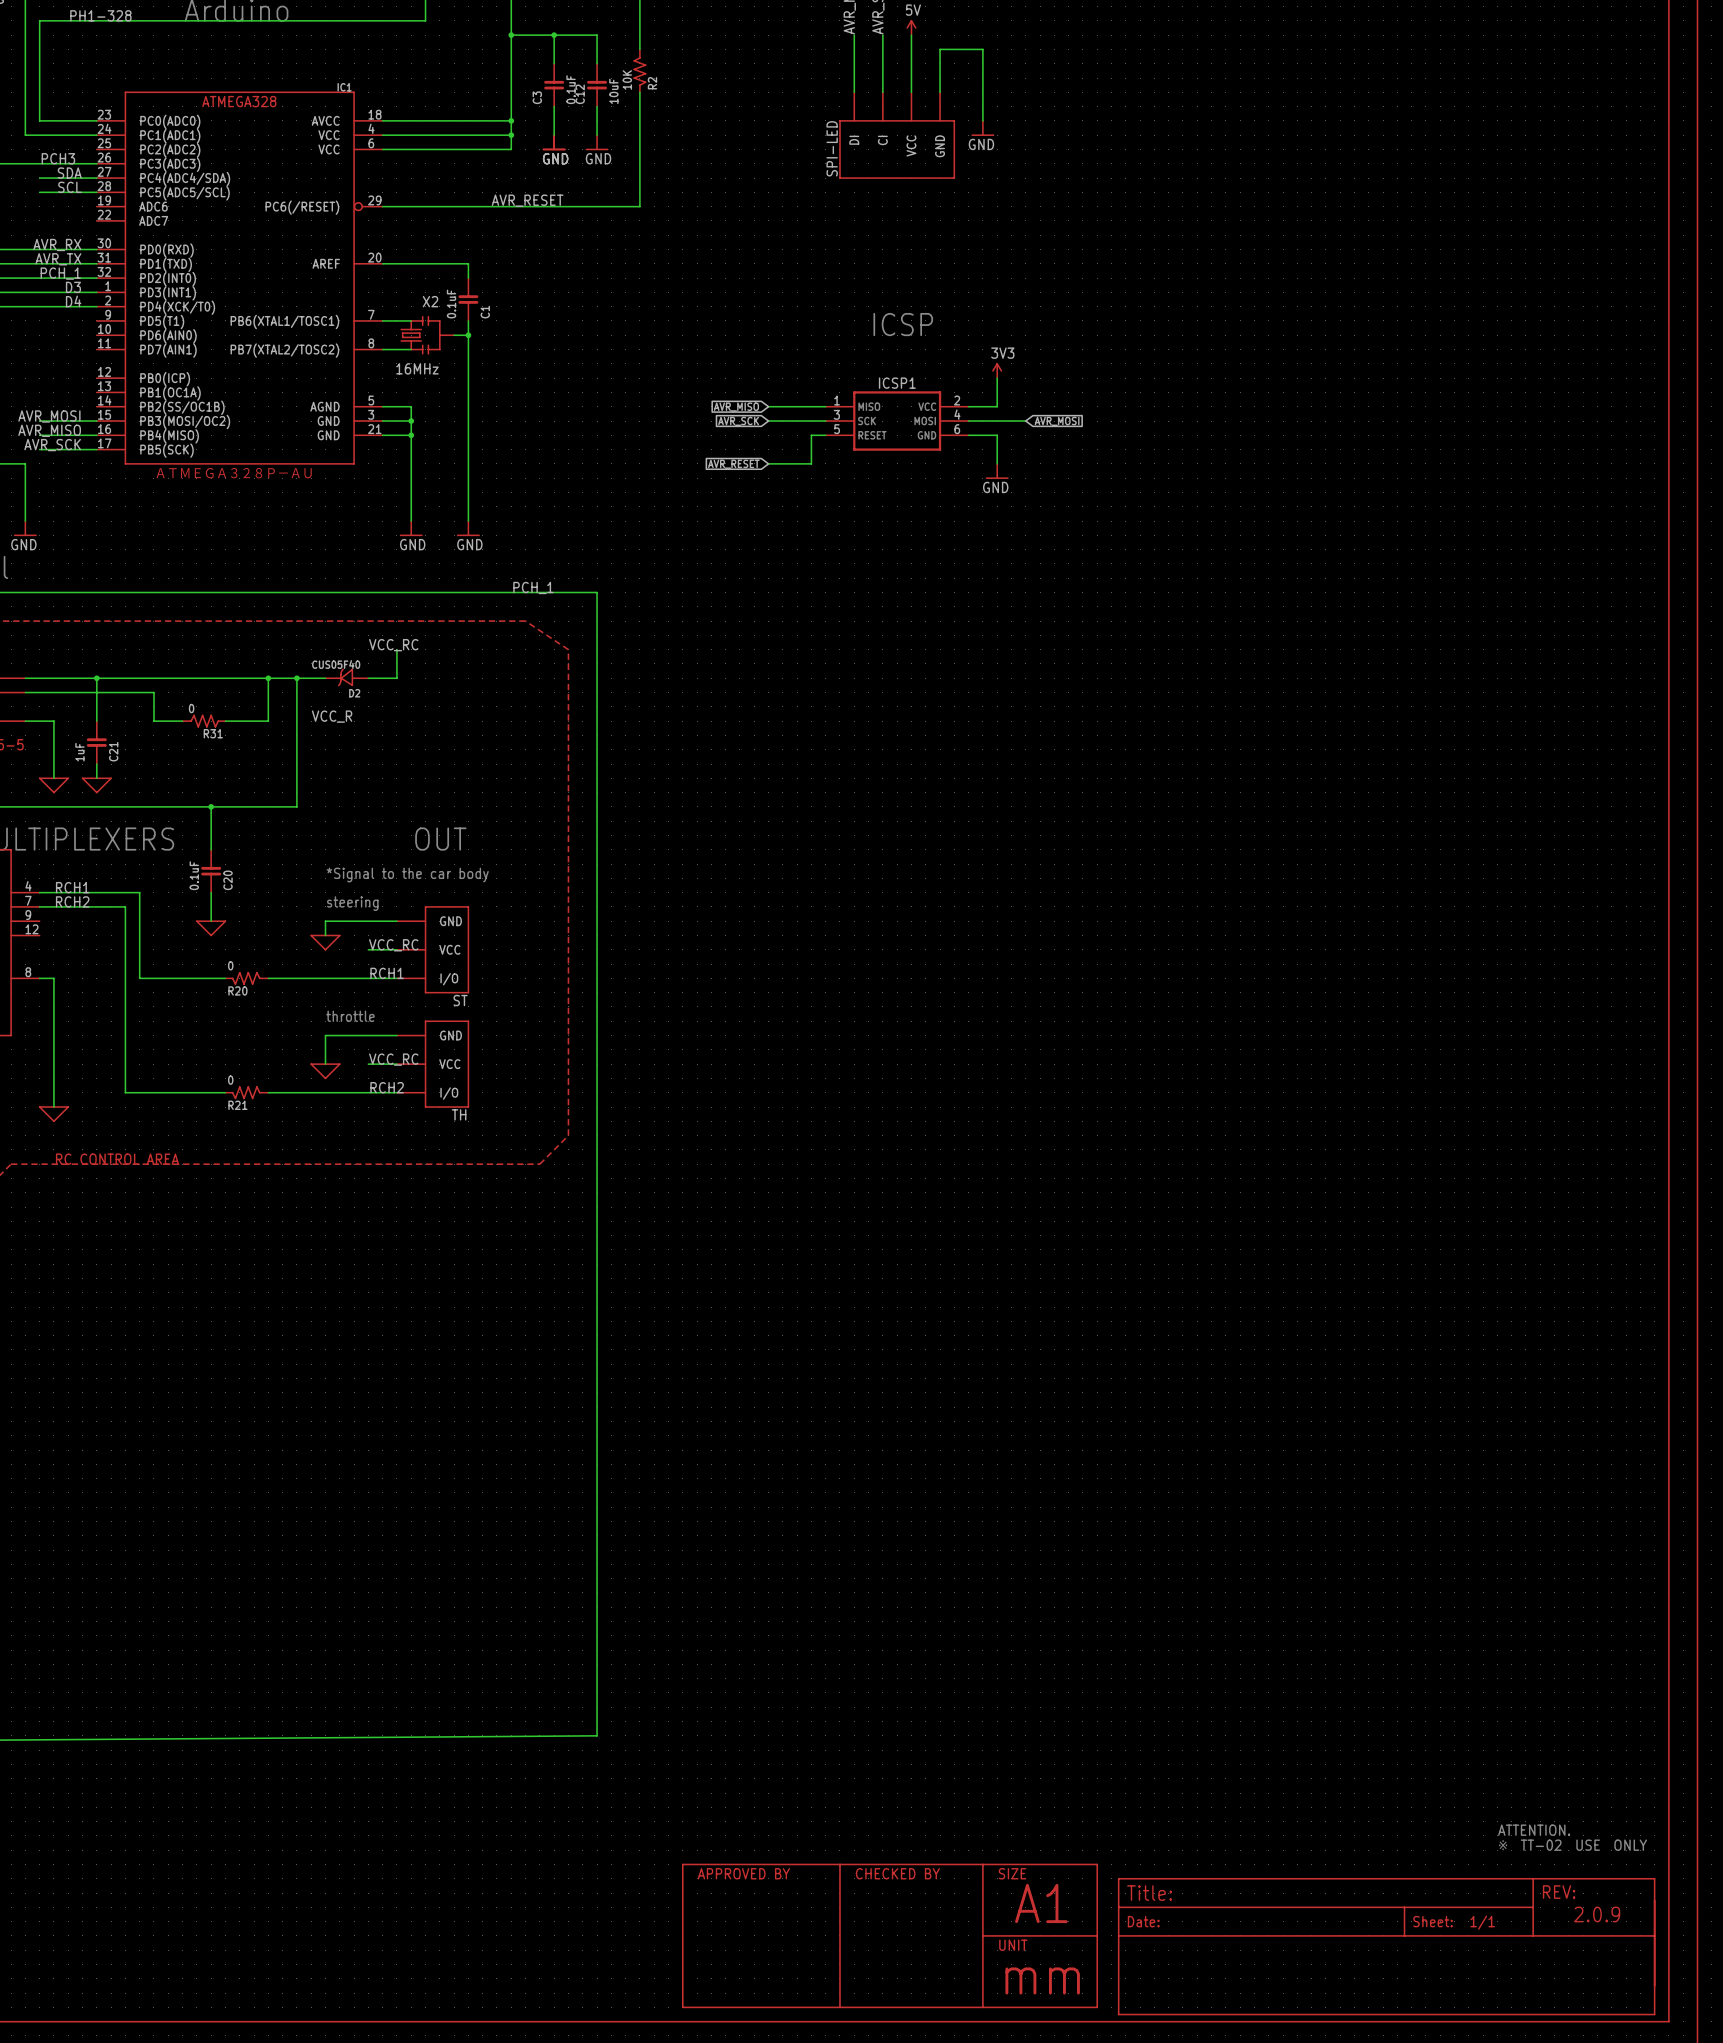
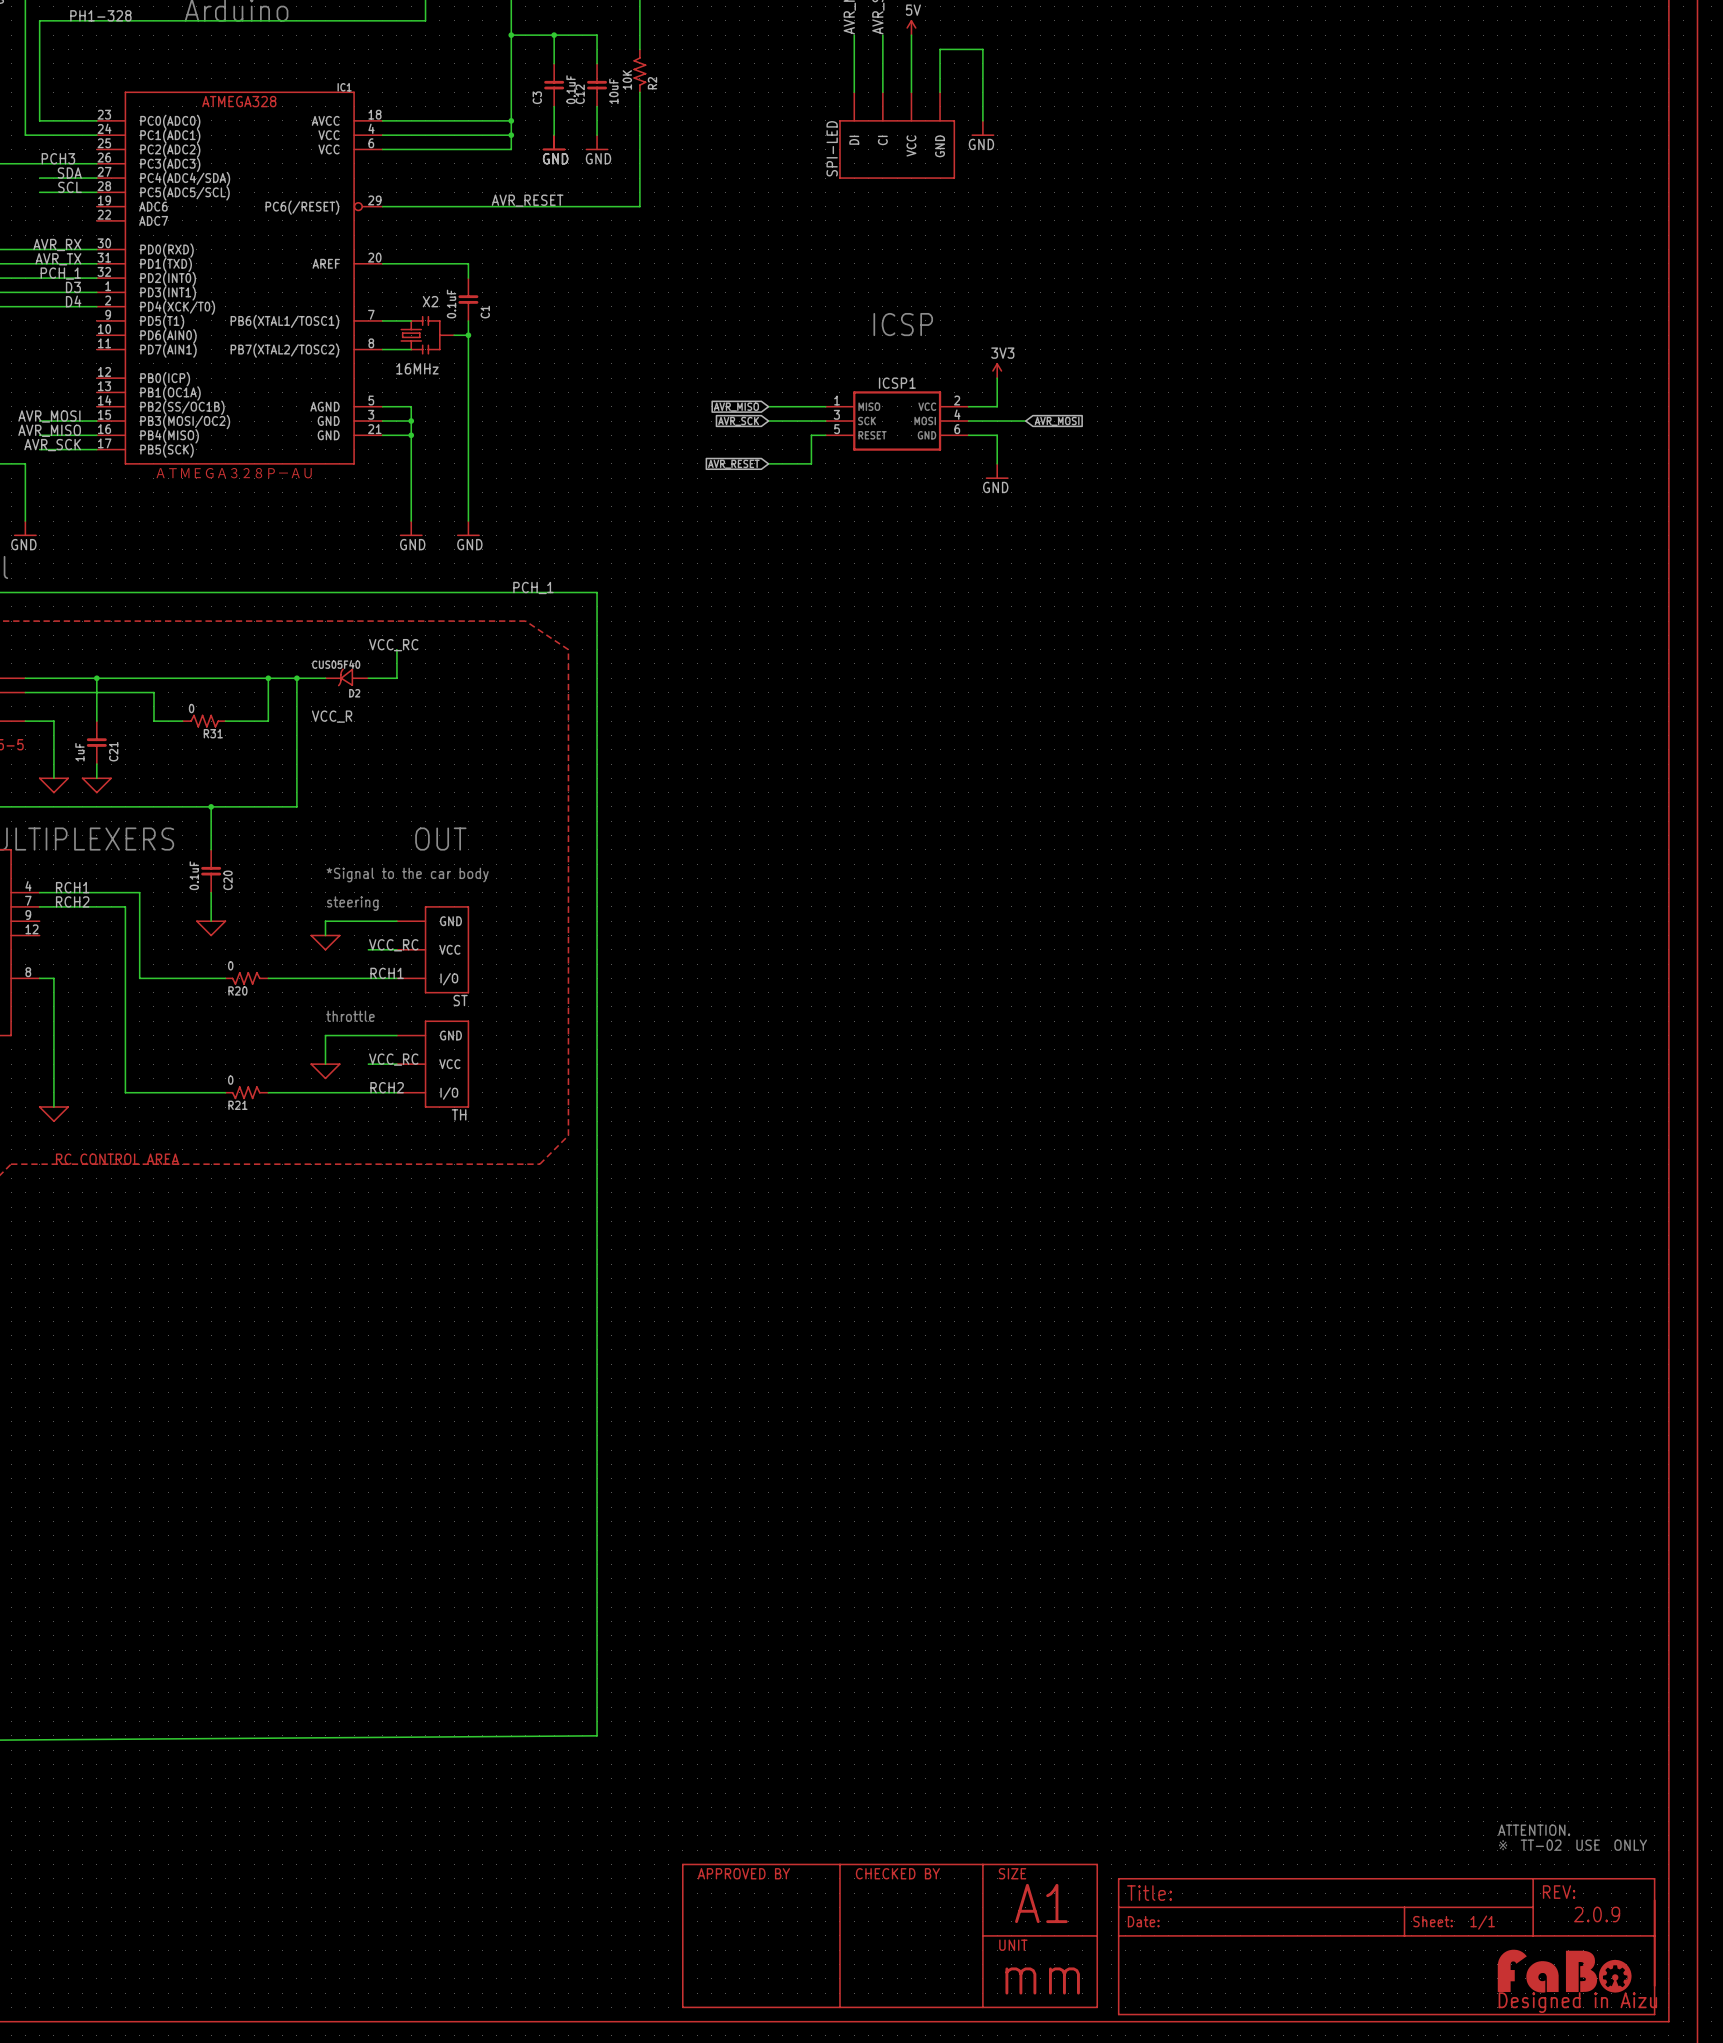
part: none -> (1564, 1971)

